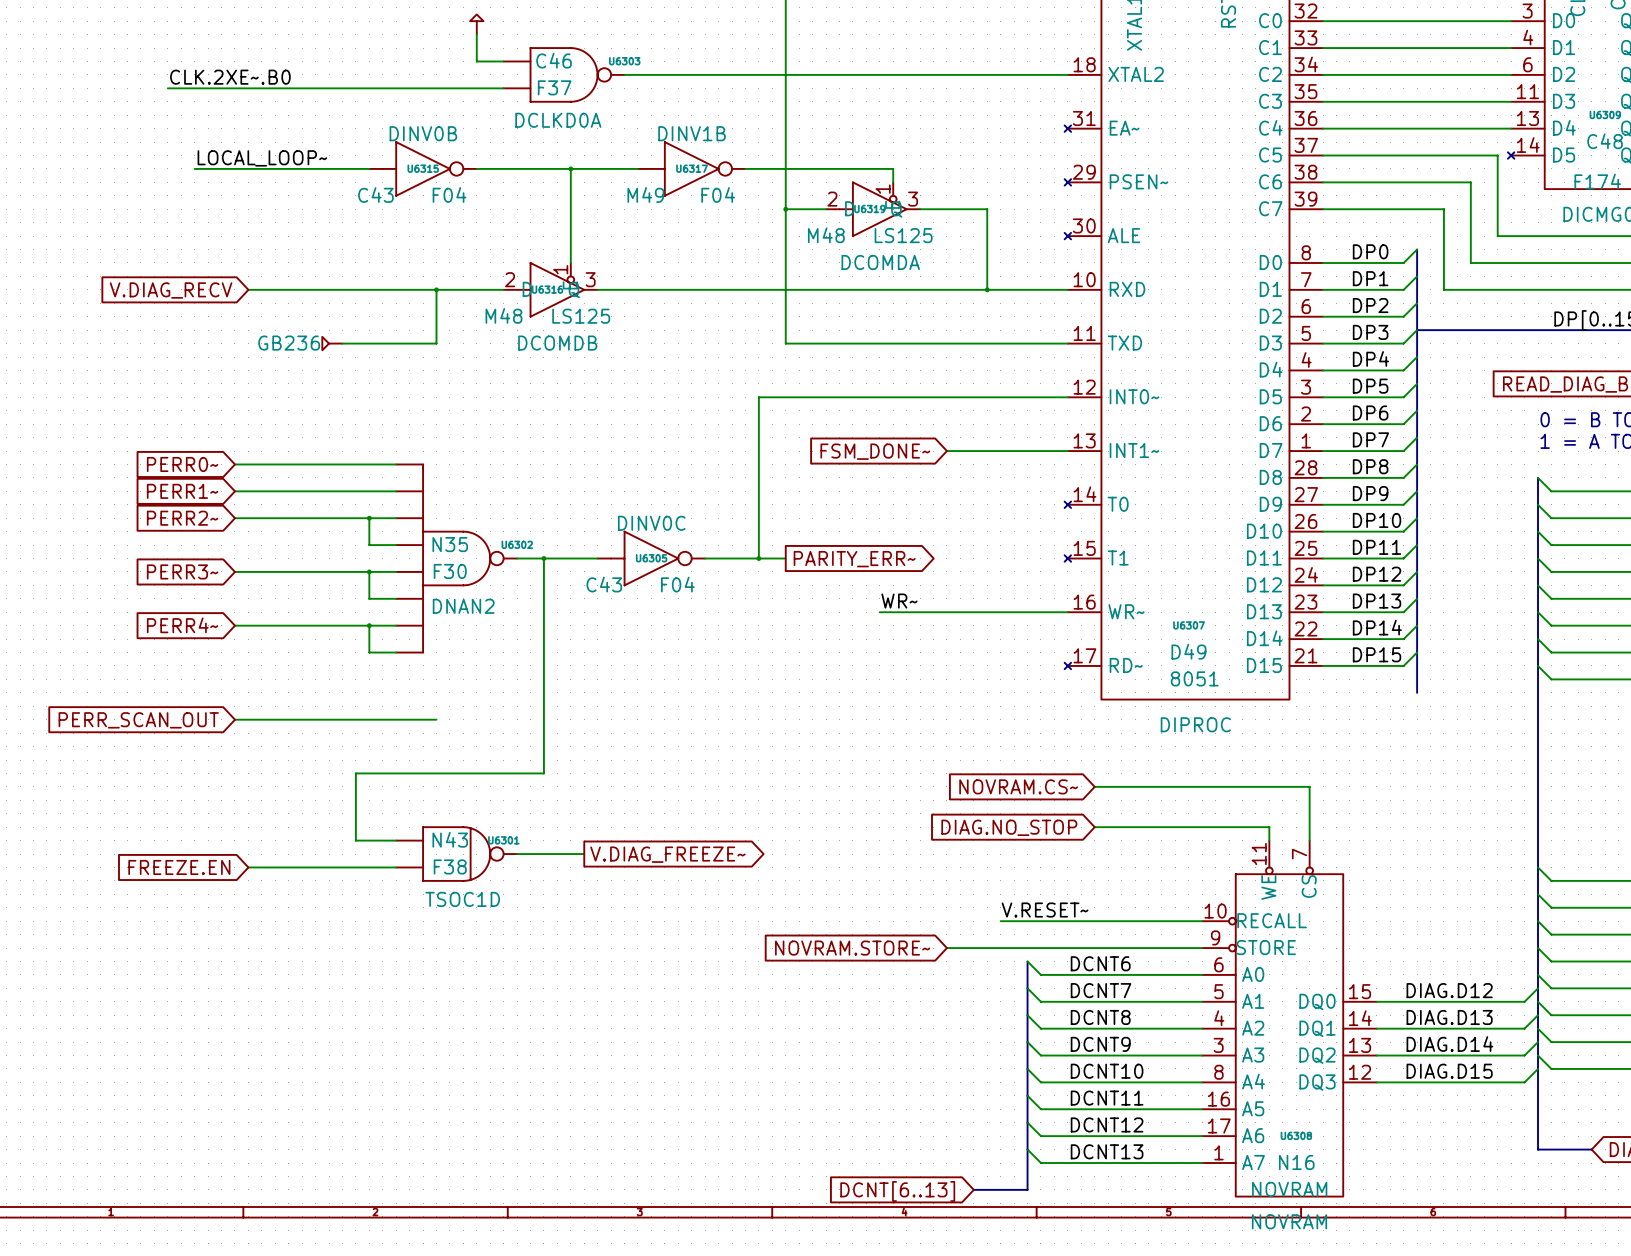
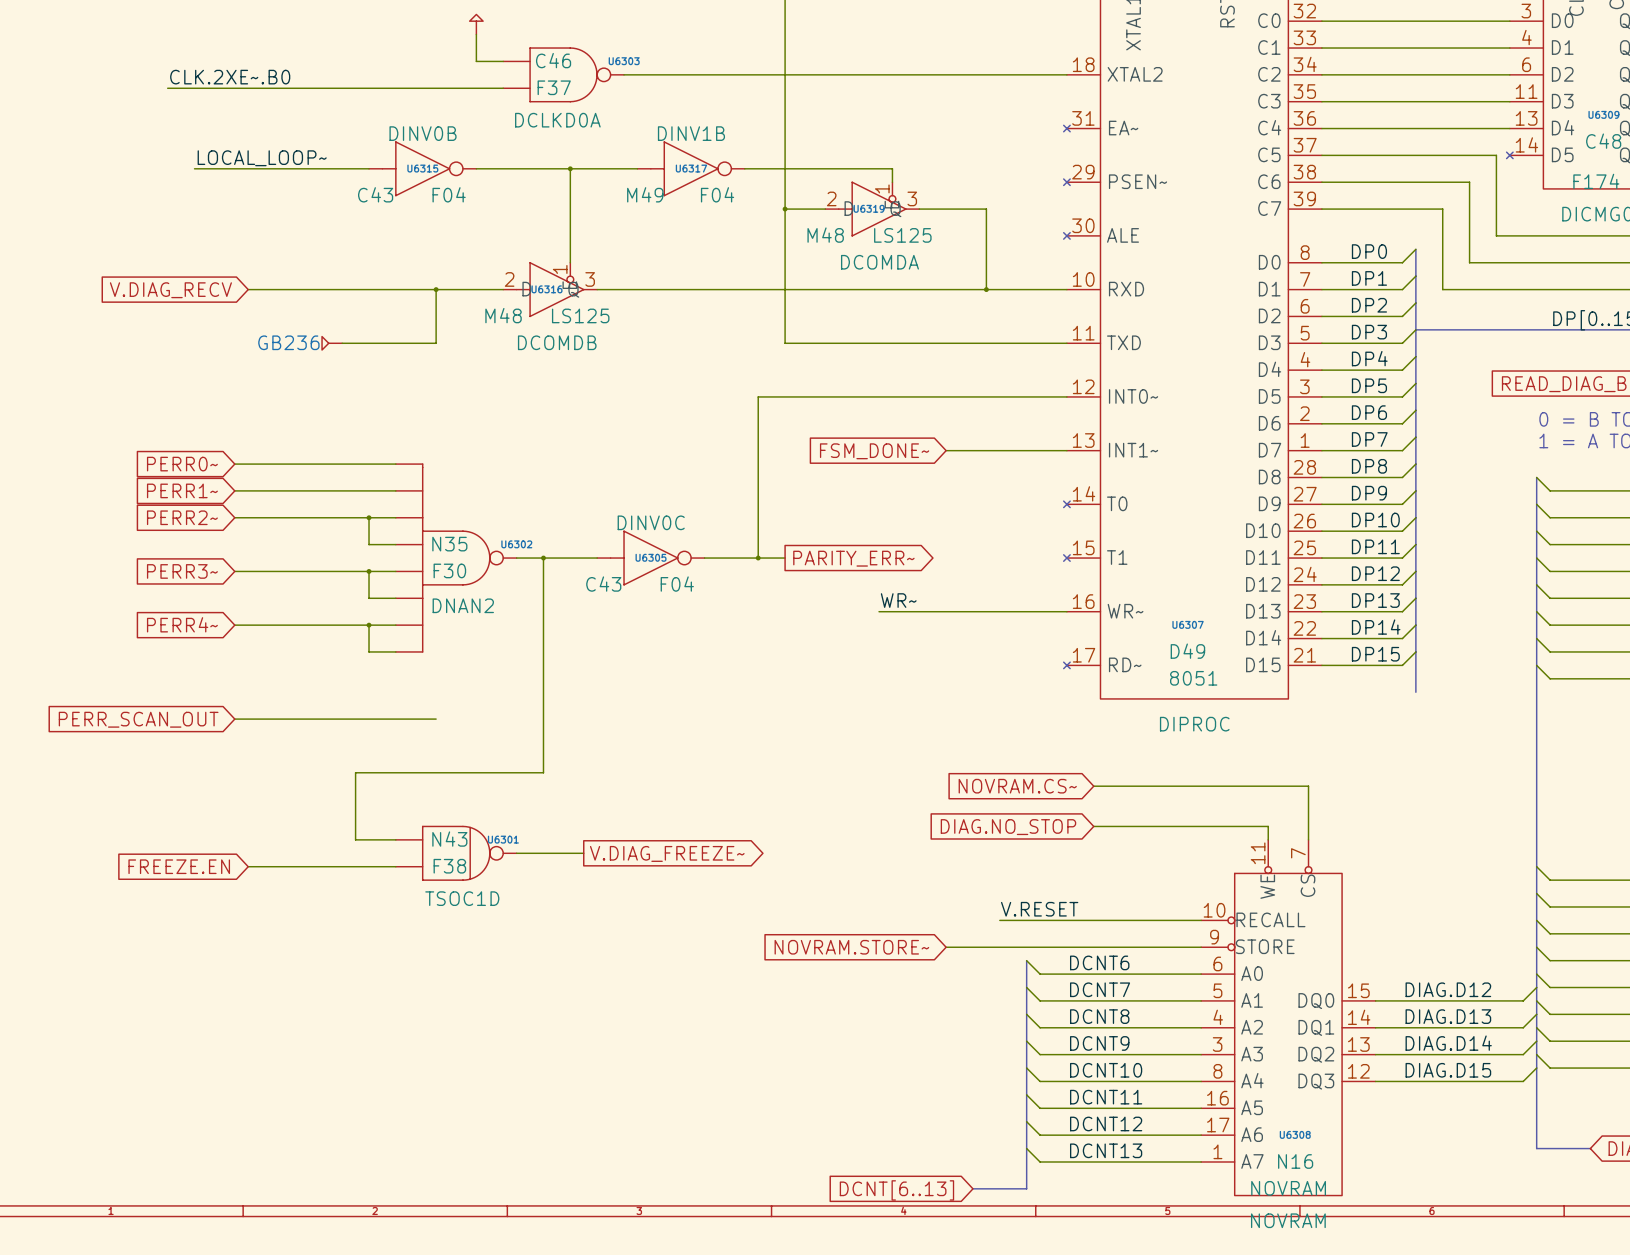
label: V.RESET~ (1045, 910) -> V.RESET (1039, 909)

